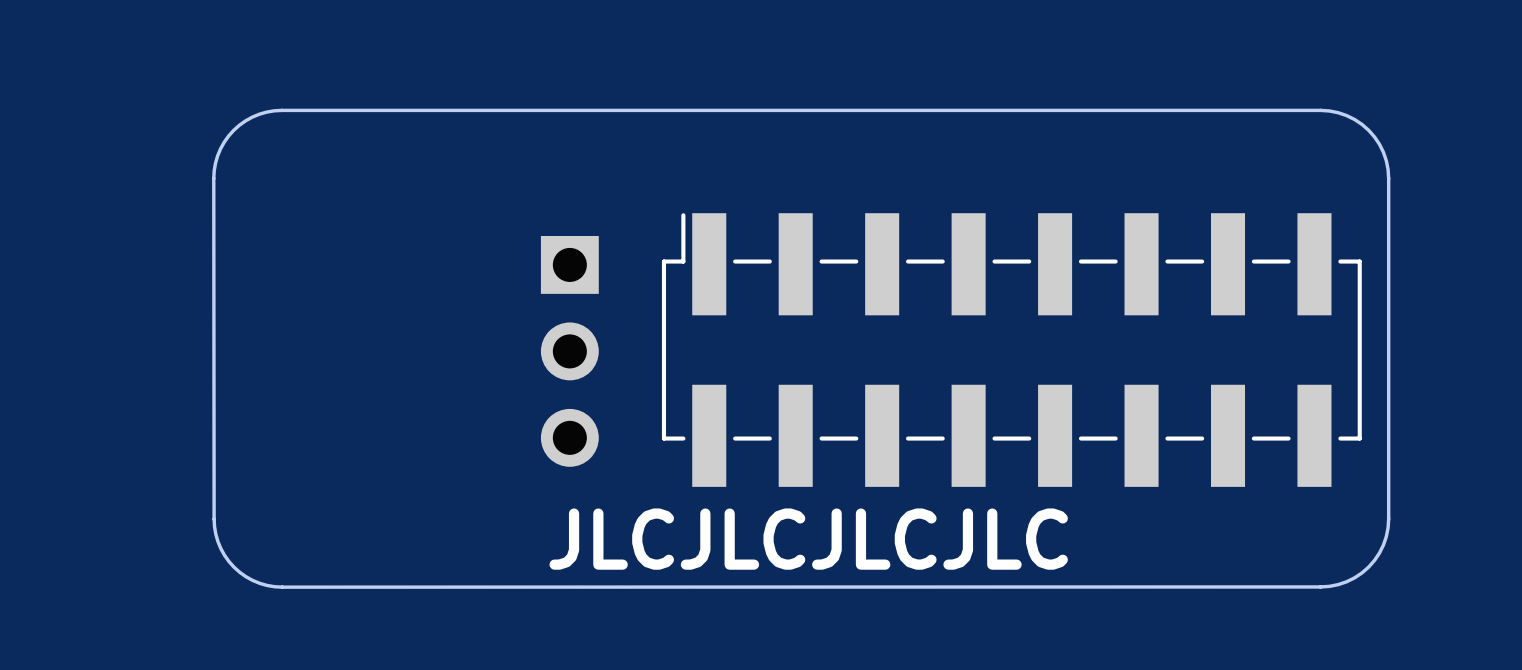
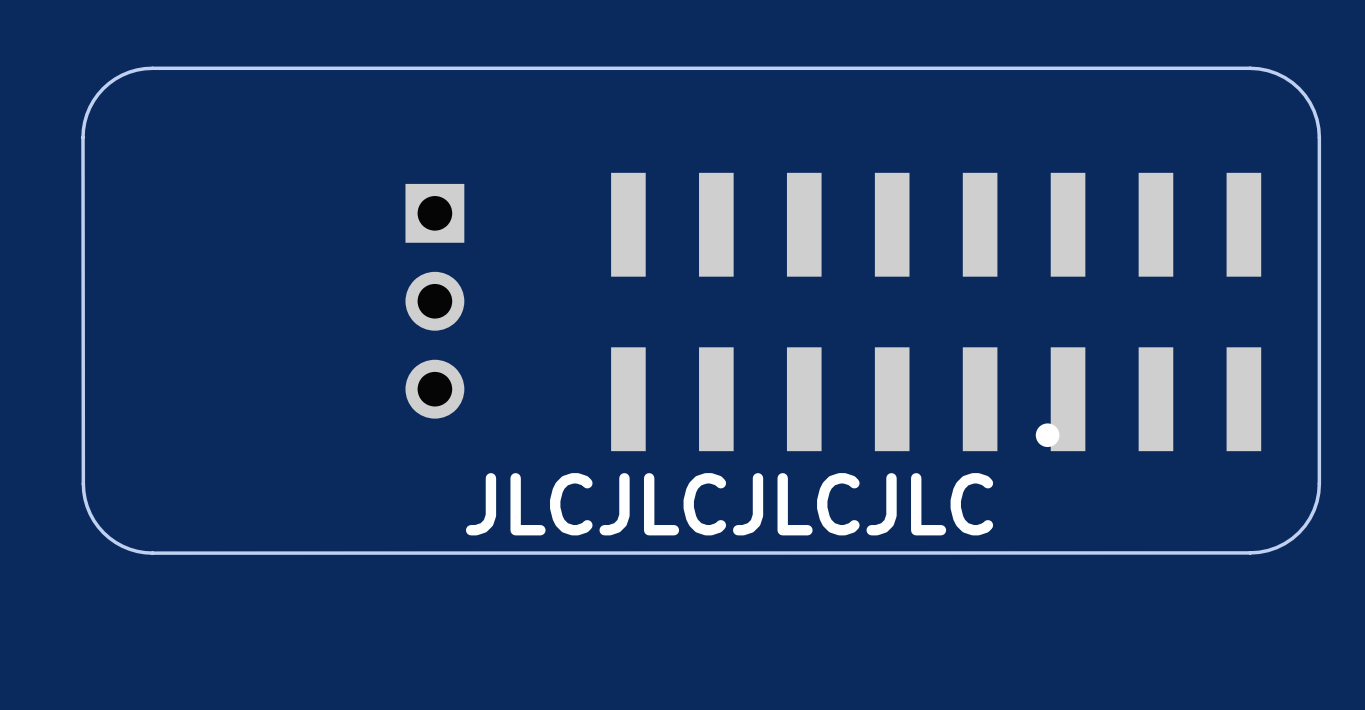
board edge: (281, 110) (259, 114) (245, 120) (233, 130) (220, 148) (214, 170) (214, 526) (217, 541) (224, 555) (239, 572) (252, 580) (267, 585) (282, 587) (1320, 586) -> (152, 68) (129, 72) (109, 83) (93, 100) (86, 114) (83, 129) (83, 491) (87, 506) (98, 527) (109, 538) (122, 546) (137, 551) (152, 553) (1250, 552)
board edge: none -> (193, 68) (152, 68)
part footprint: [661, 213, 1362, 487] -> [611, 172, 1262, 452]
part position: (569, 351) -> (434, 301)
drawing: none -> [1035, 423, 1060, 448]

